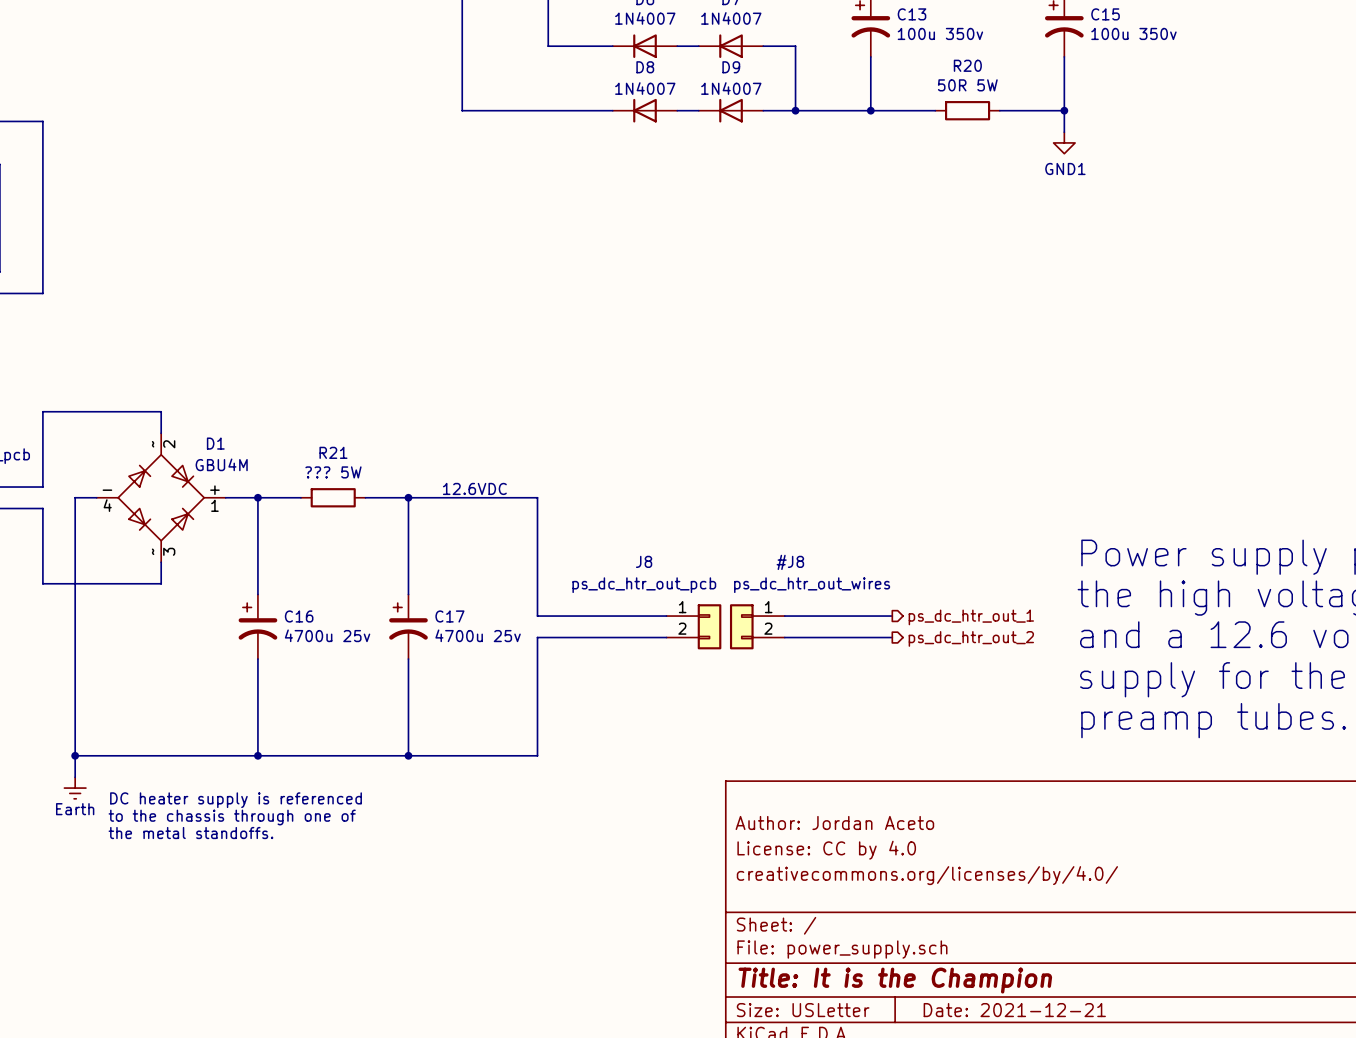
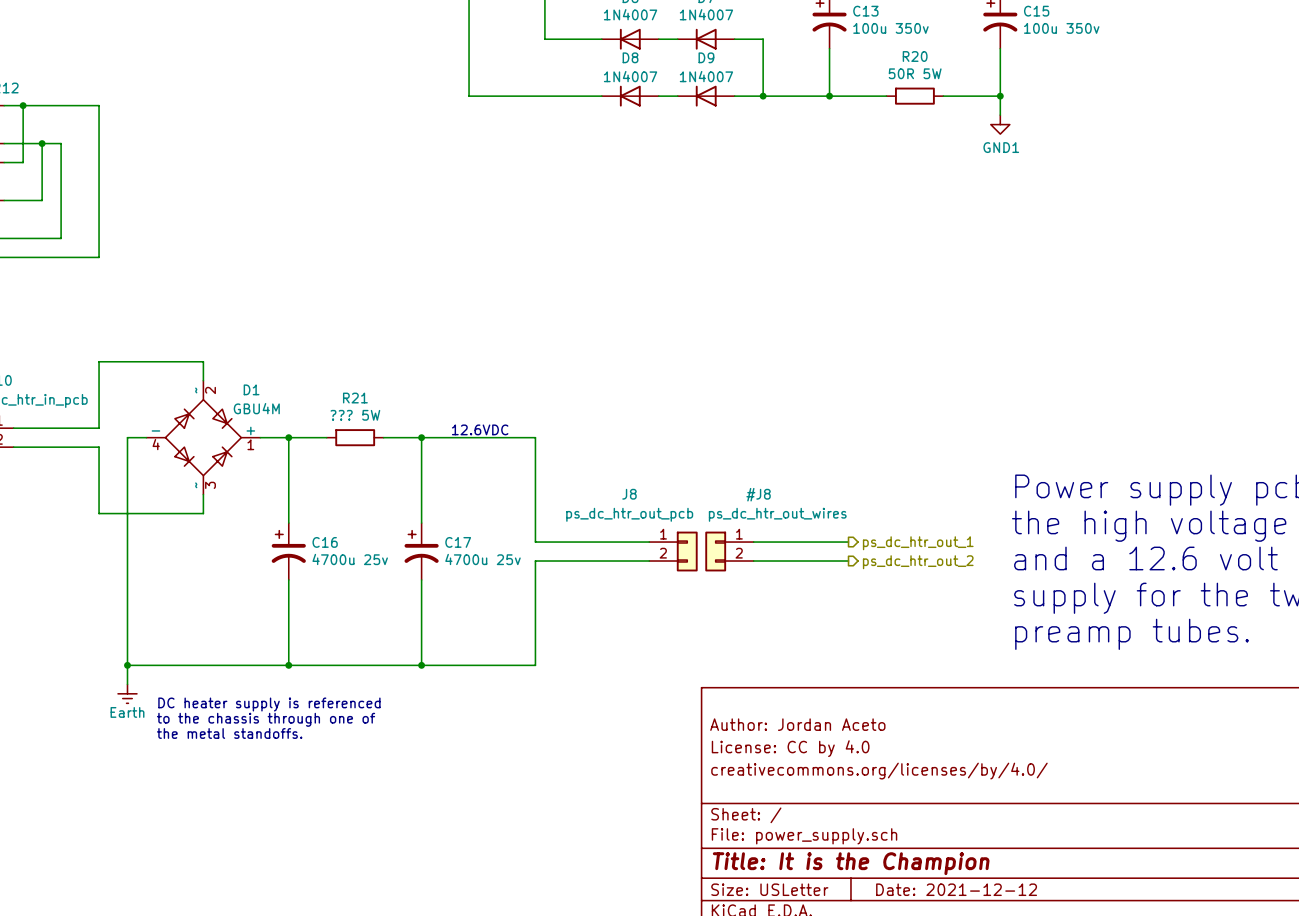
title block: Date: 2021-12-21 (1014, 1010) -> Date: 2021-12-12 (956, 889)

